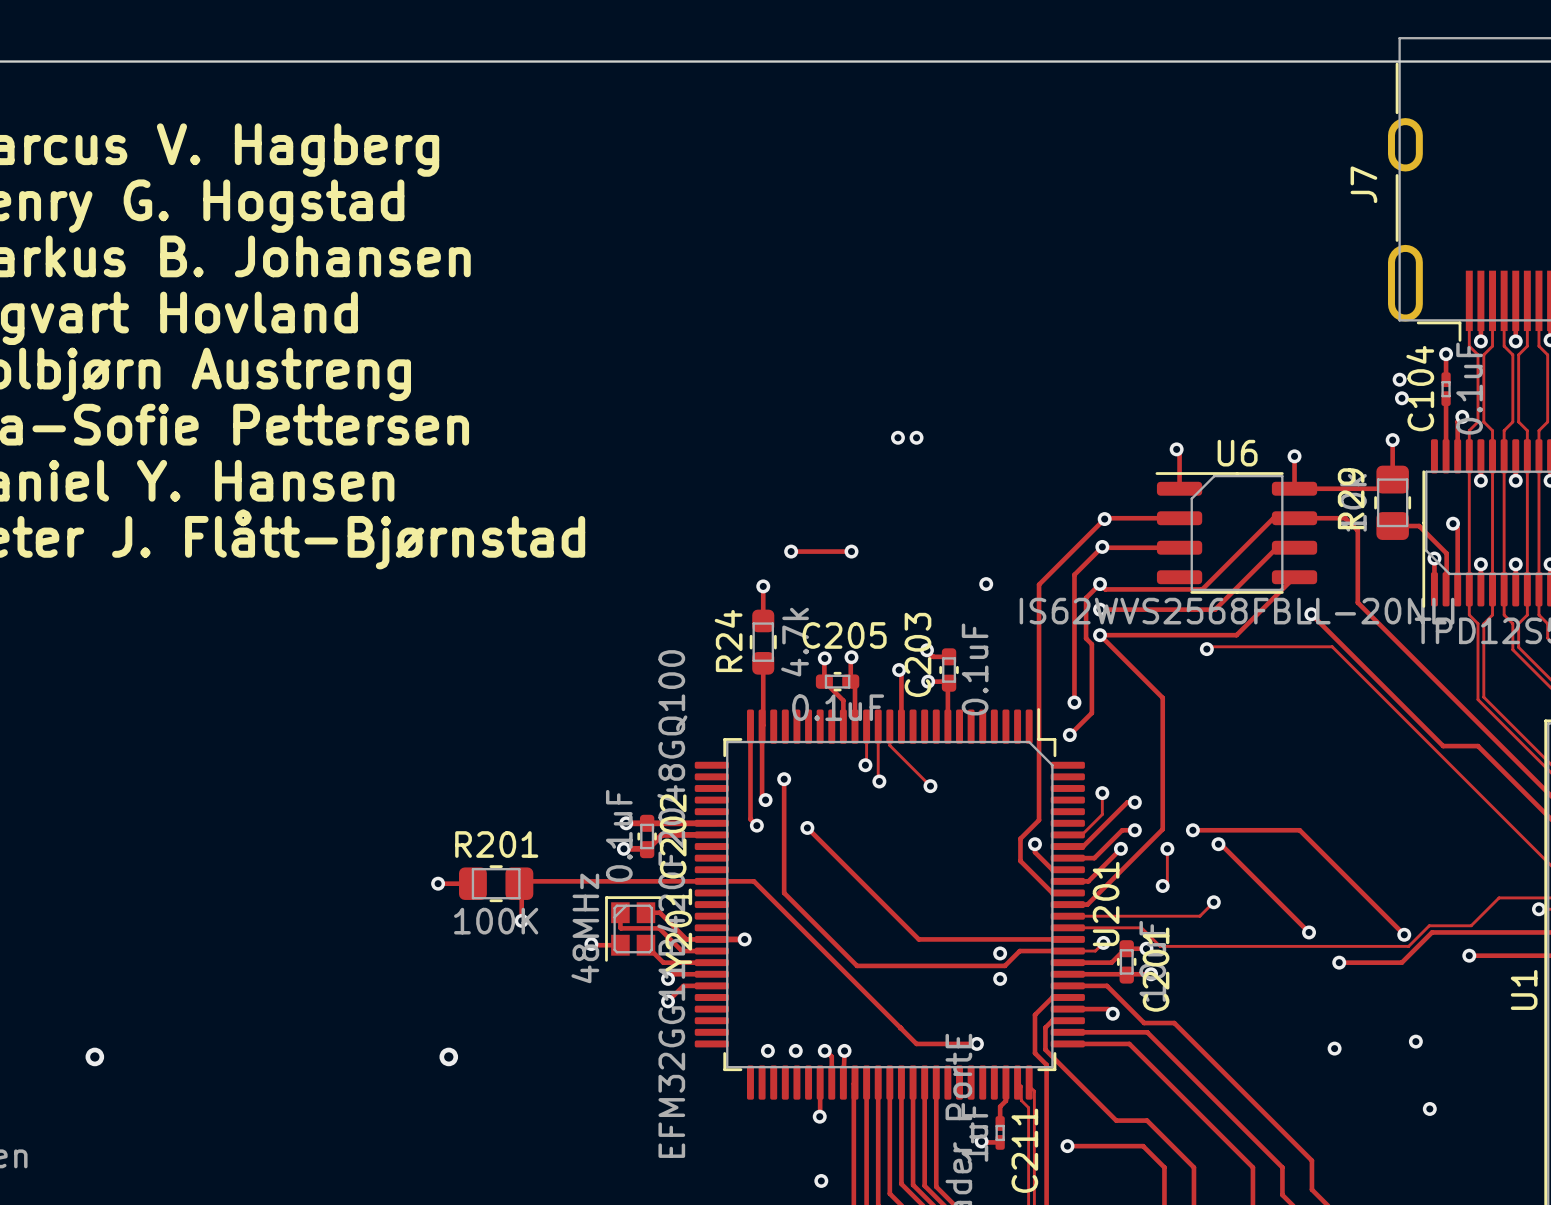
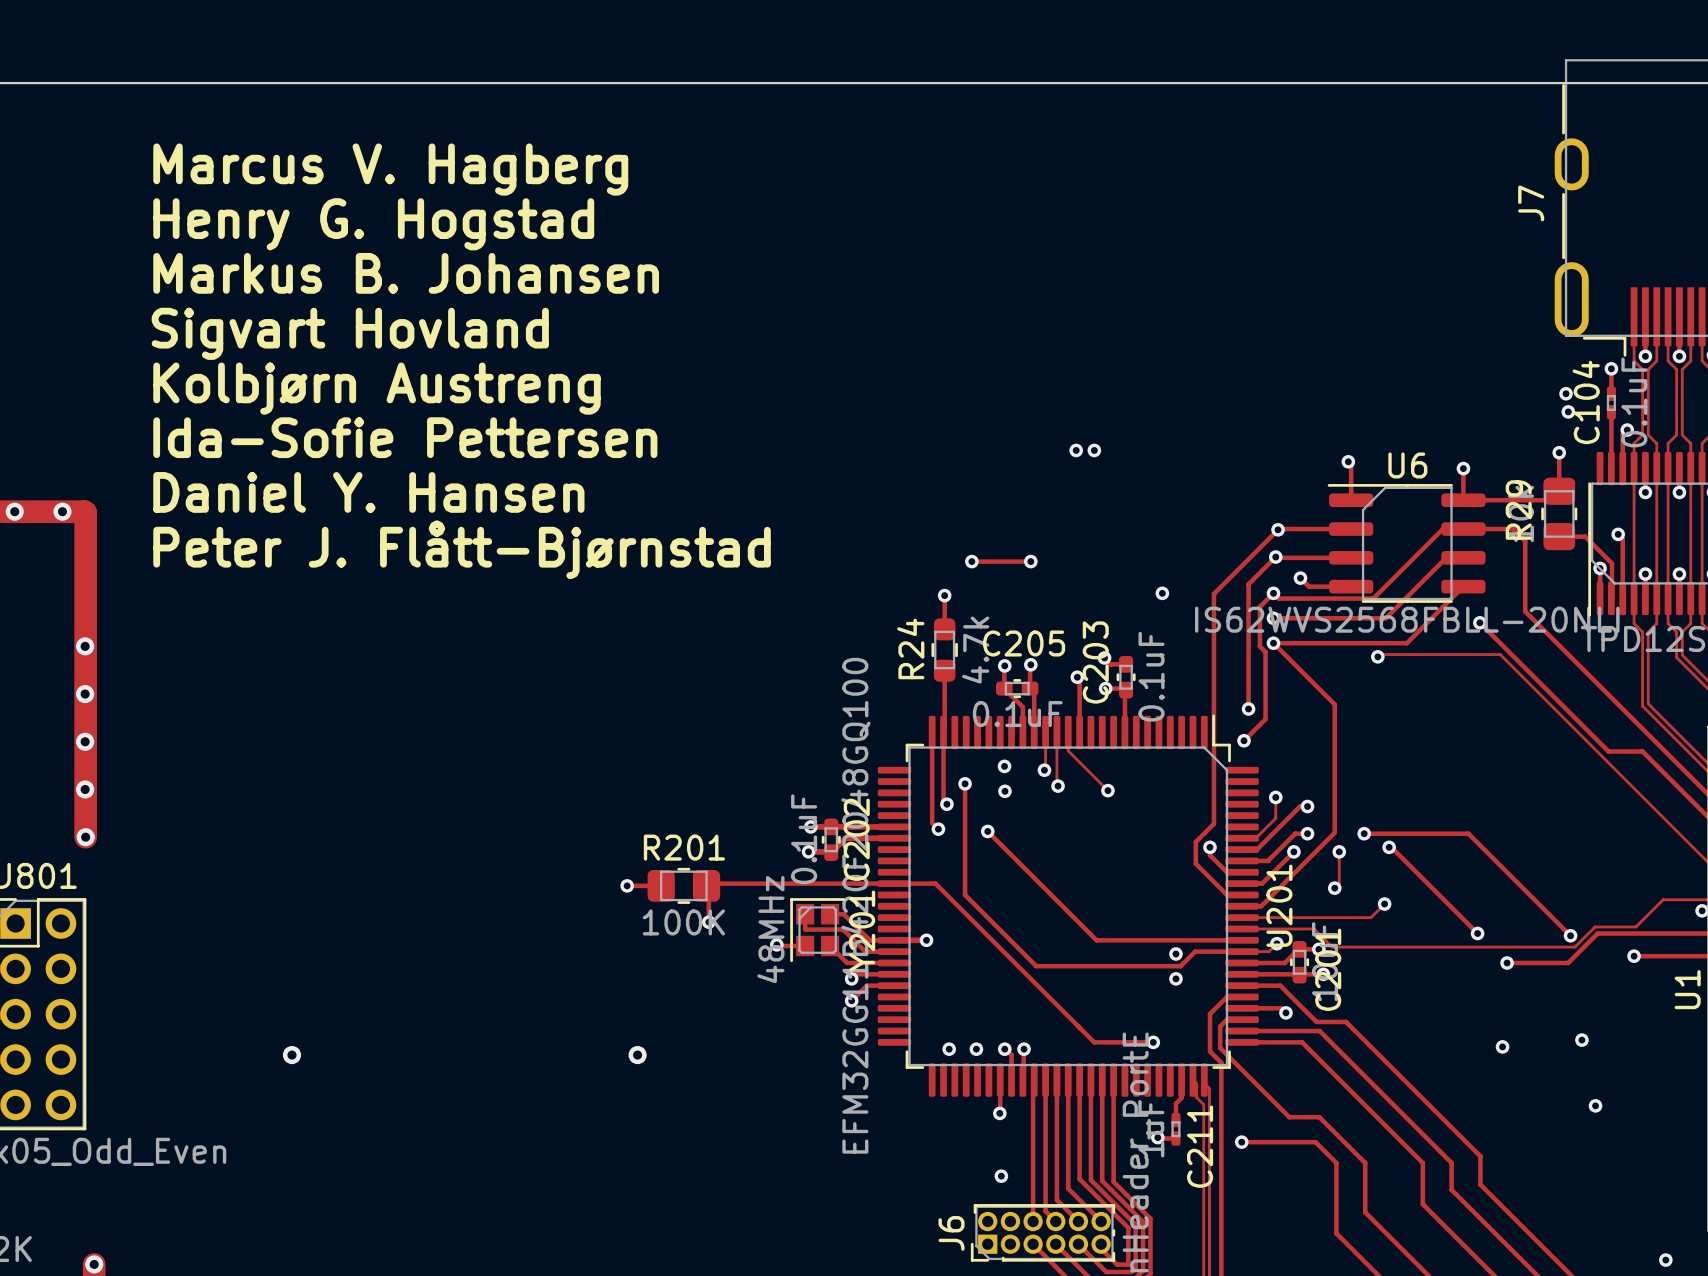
track: none -> (1300, 578) (1308, 586) (1351, 586)
via: none -> (1300, 578)
via: none -> (1004, 766)
via: none -> (1004, 791)

